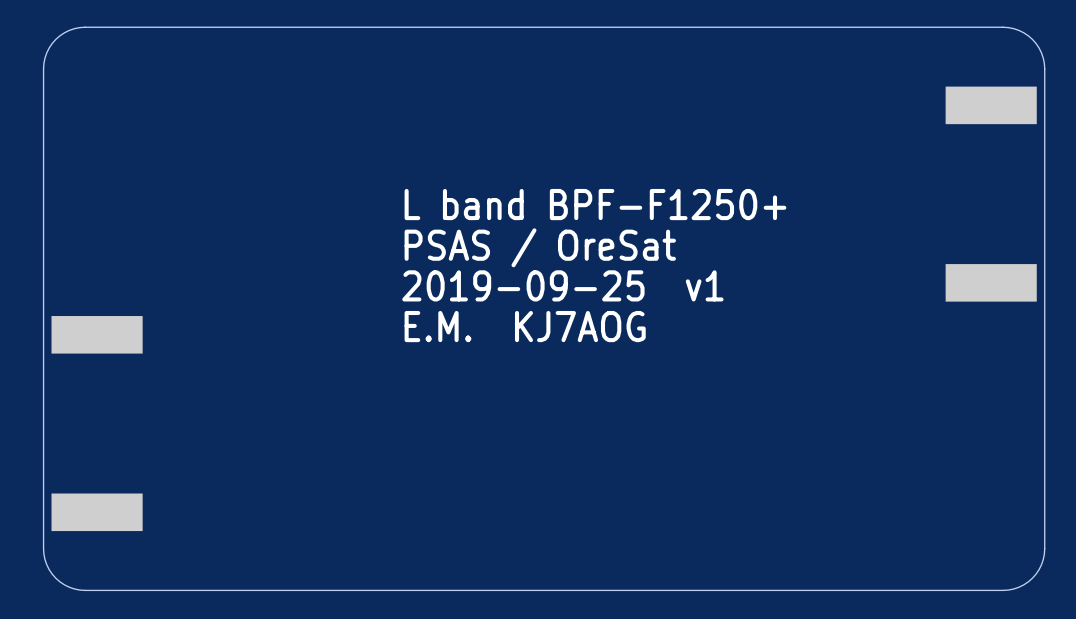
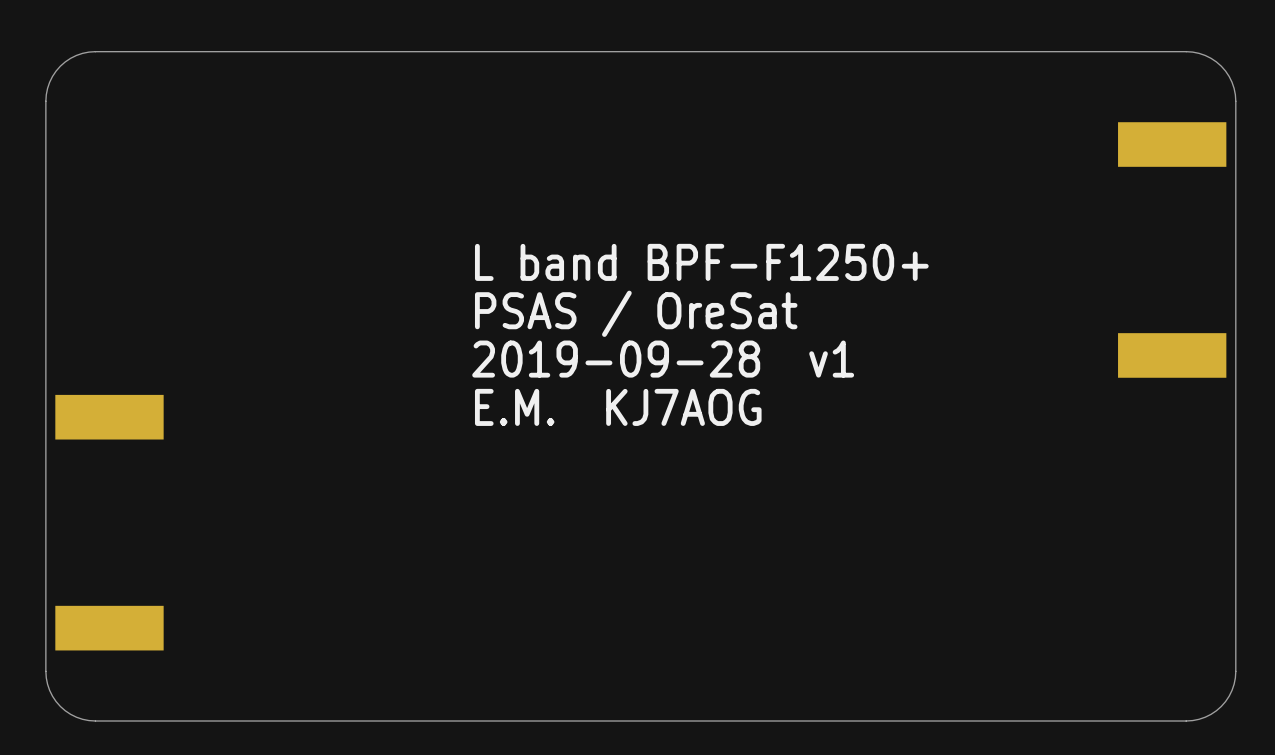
text: 2019-09-25 v1 (562, 285) -> 2019-09-28 v1 (663, 359)

